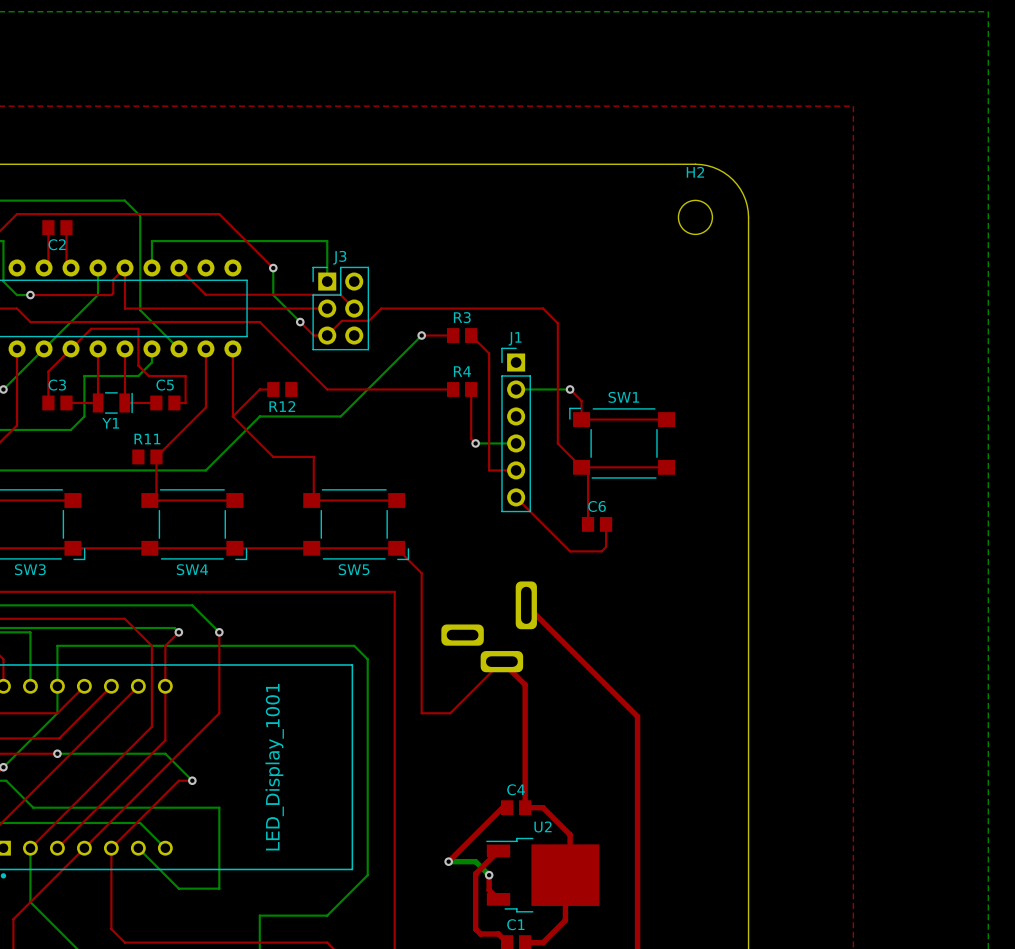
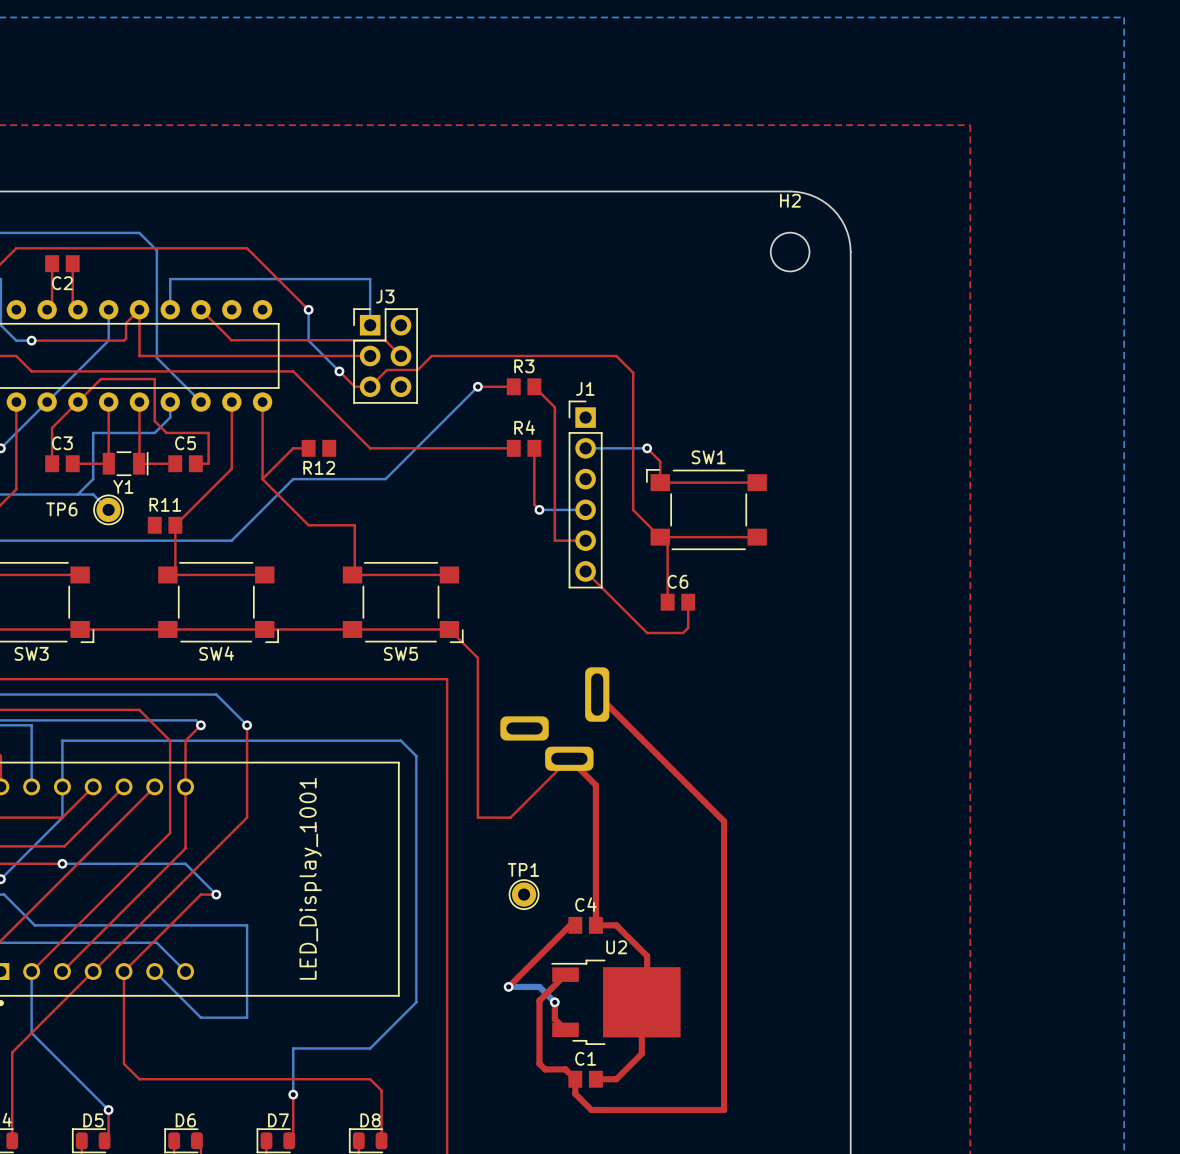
bottom track: none -> (77, 494) (93, 494) (108, 509)
TP6: none -> (108, 509)
TP1: none -> (524, 894)

